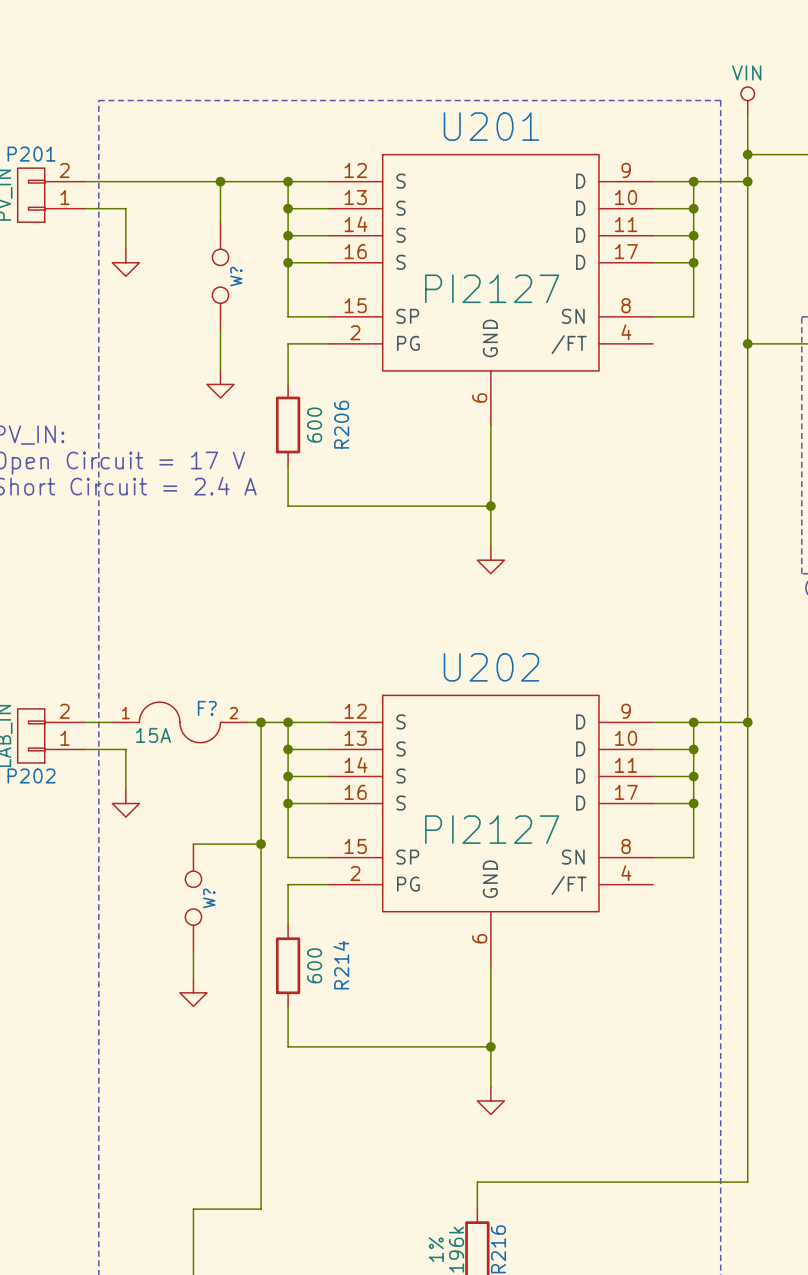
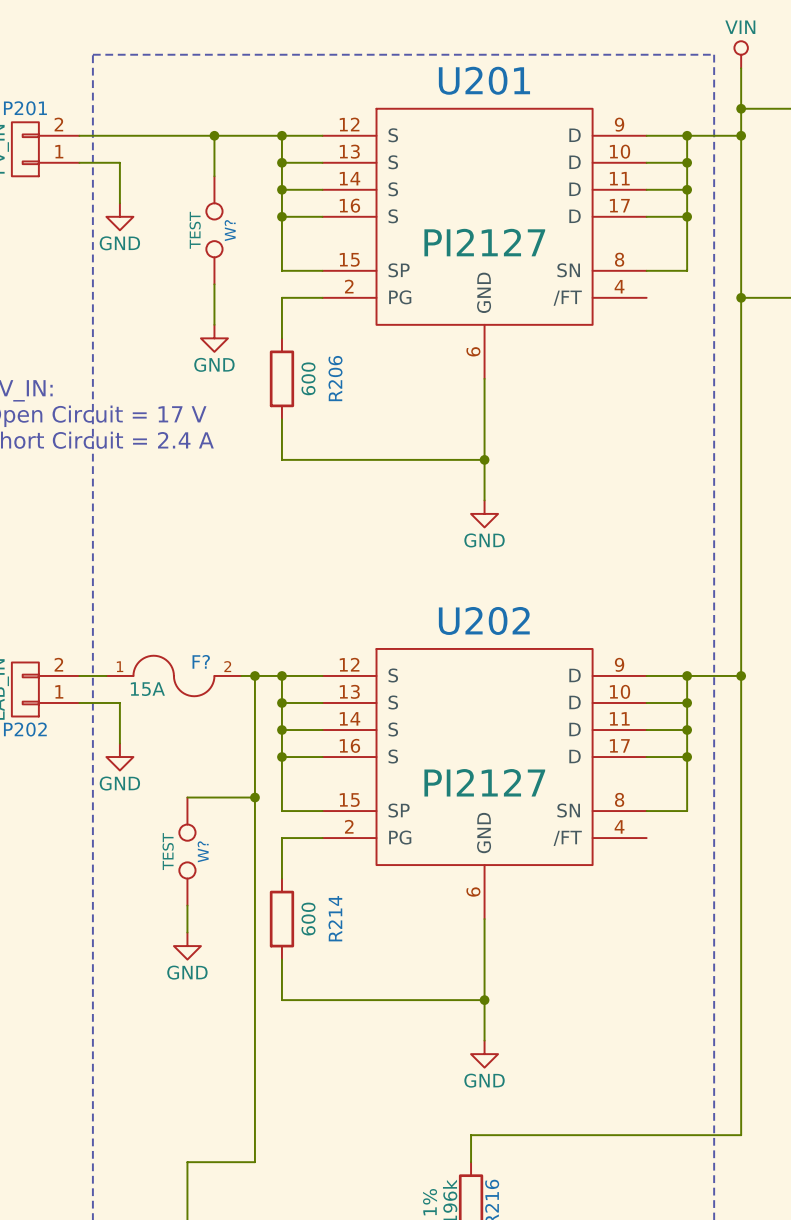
W? value: none -> TEST (195, 230)
power symbol text: none -> GND (119, 243)
power symbol text: none -> GND (214, 364)
power symbol text: none -> GND (484, 540)
power symbol text: none -> GND (119, 783)
W? value: none -> TEST (168, 851)
power symbol text: none -> GND (187, 972)
power symbol text: none -> GND (484, 1080)

